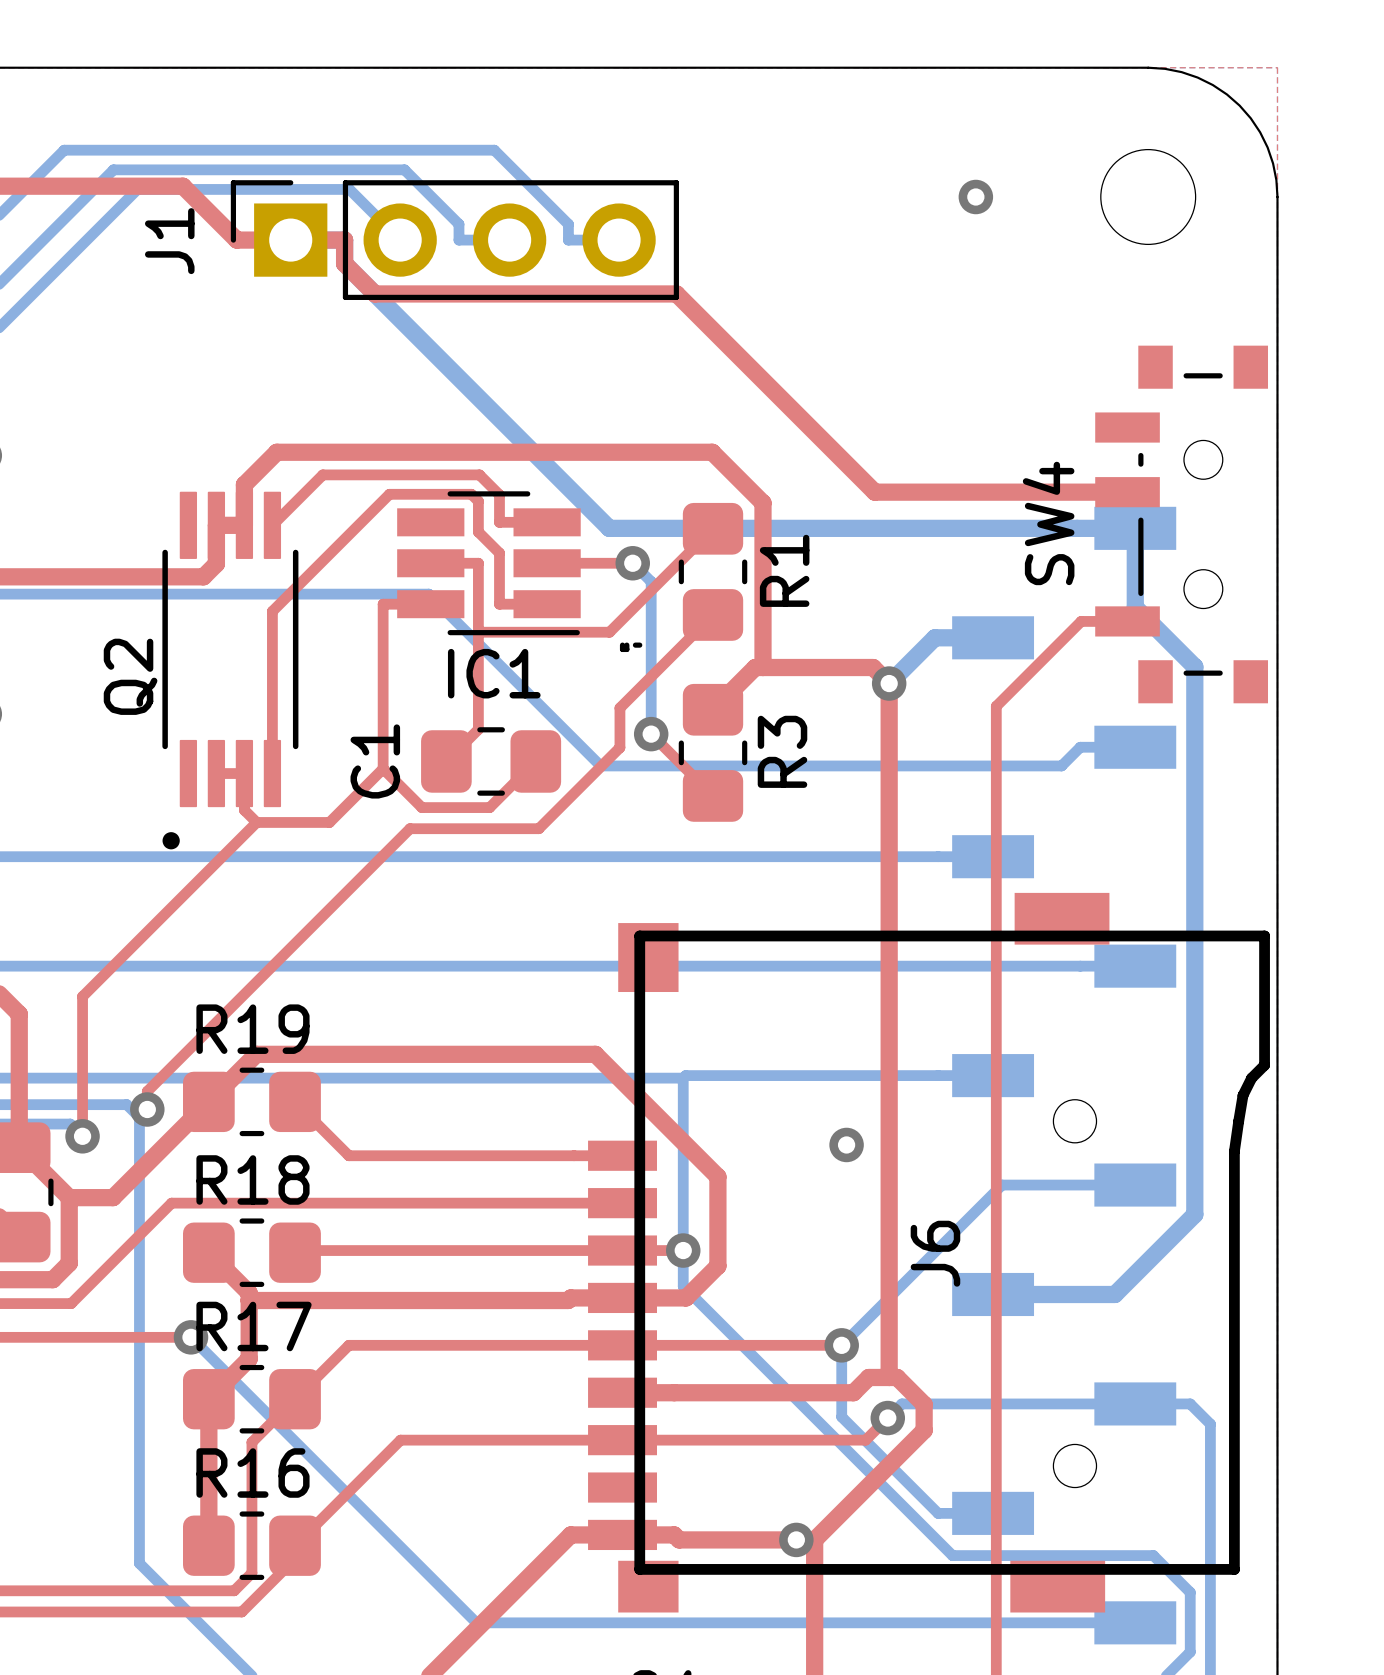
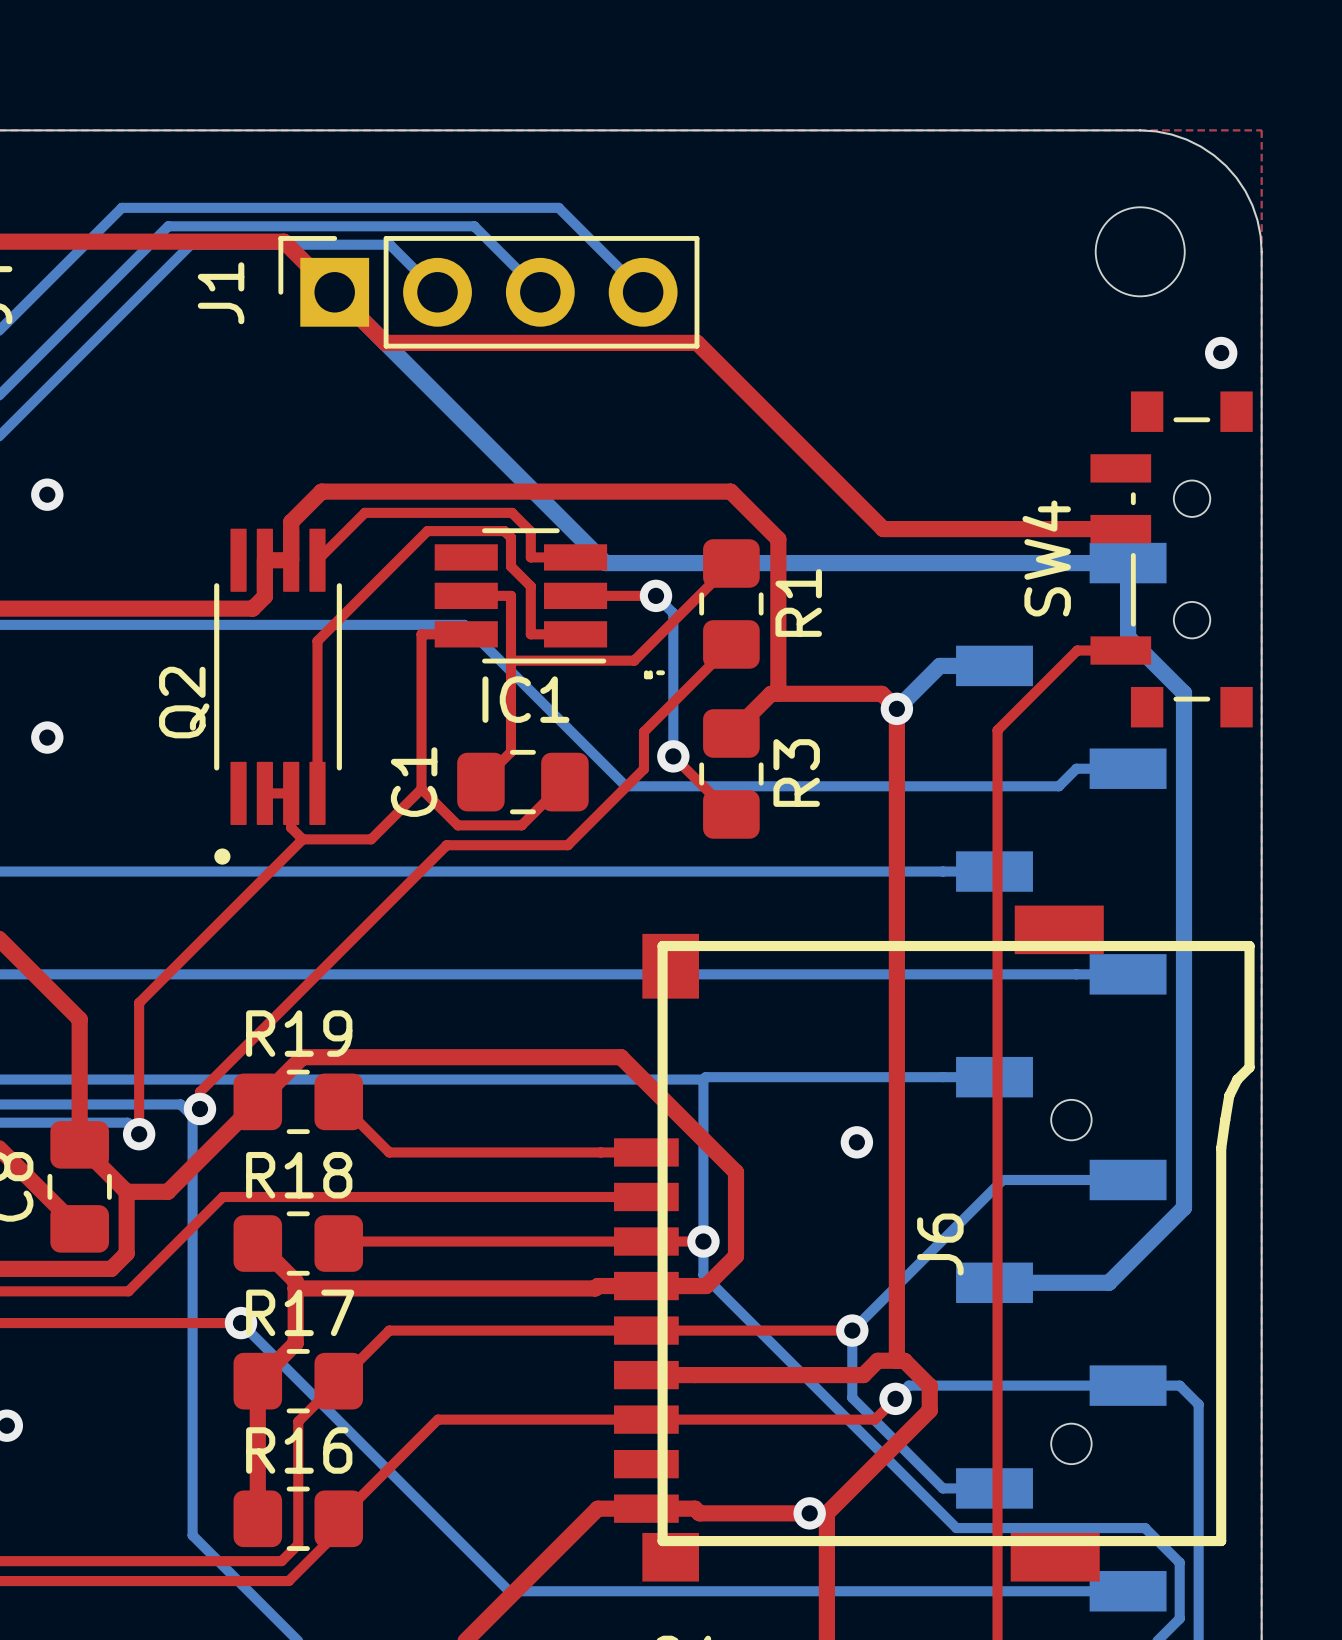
bottom track: (494, 150) (568, 224) (568, 240) (619, 240) -> (525, 207) (558, 207) (643, 292)
bottom track: (404, 169) (458, 224) (458, 240) (509, 240) -> (441, 226) (474, 226) (540, 292)
top track: (182, 186) (236, 240) (290, 240) -> (233, 241) (284, 241) (385, 342) (413, 342)
via: (975, 196) -> none
bottom track: (290, 240) (344, 240) (344, 263) (609, 528) -> (334, 292) (605, 563) (633, 563)
top track: (317, 240) (344, 240) (344, 263) (374, 293) -> none
via: none -> (1221, 353)

